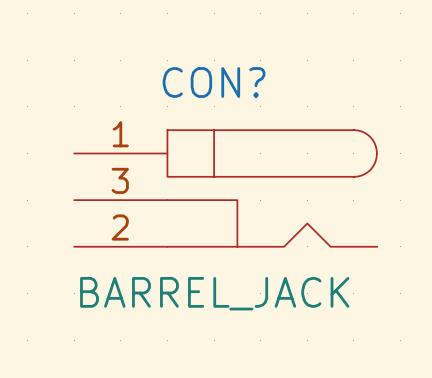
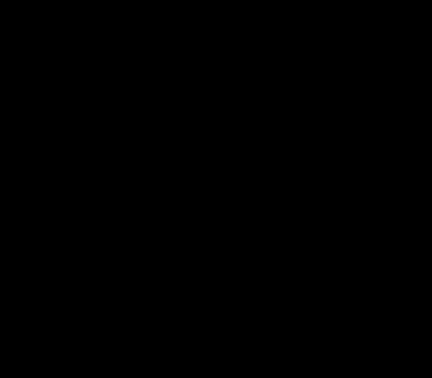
CON?: BARREL_JACK (225, 188) -> none

